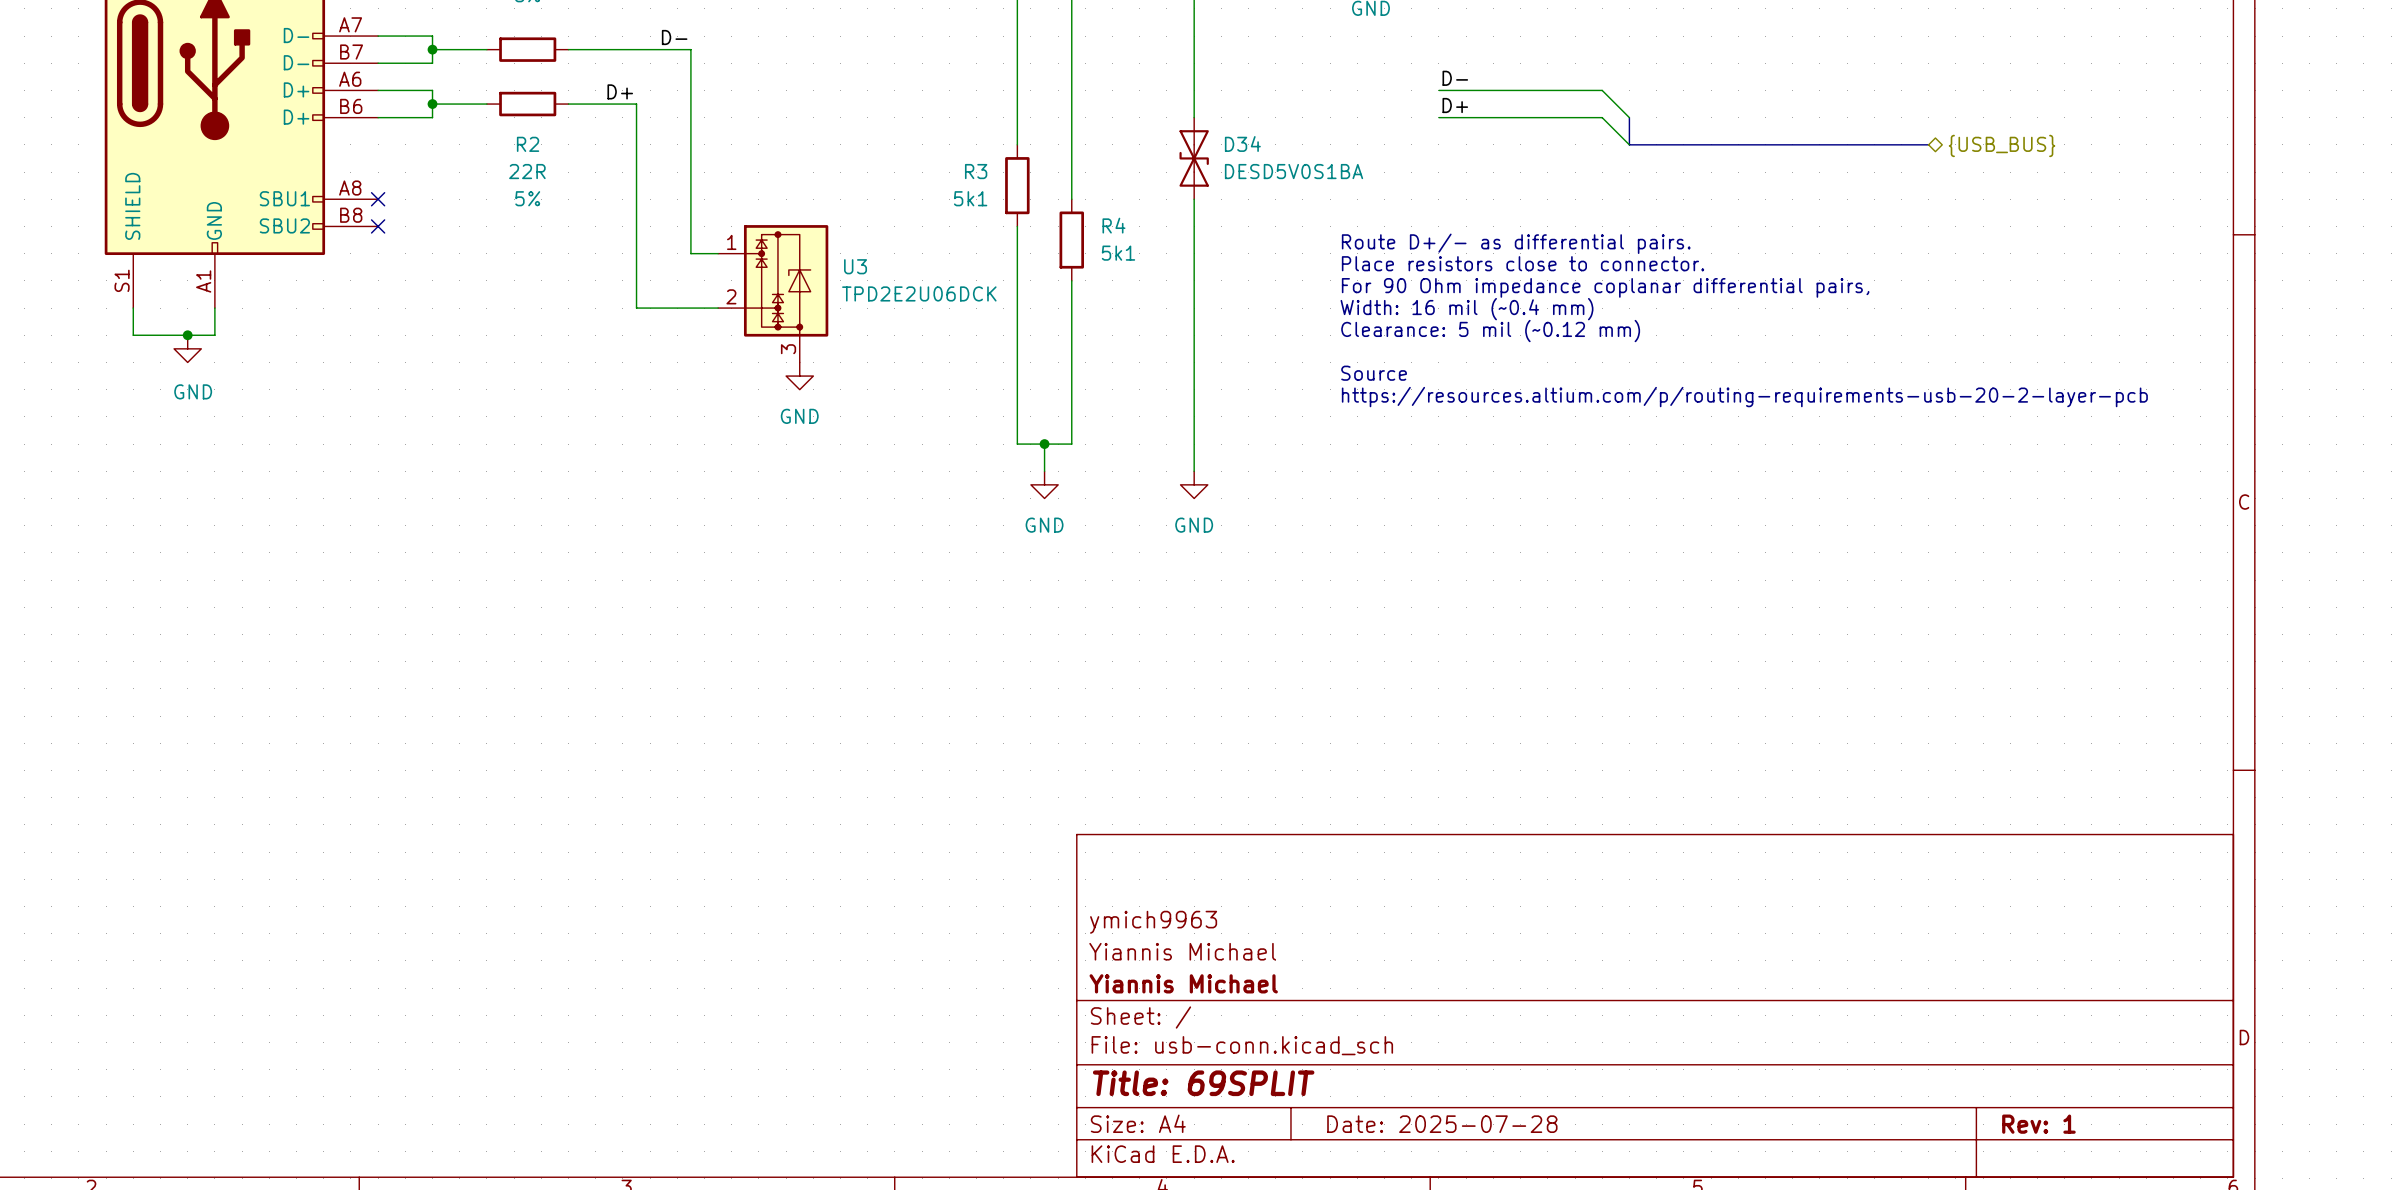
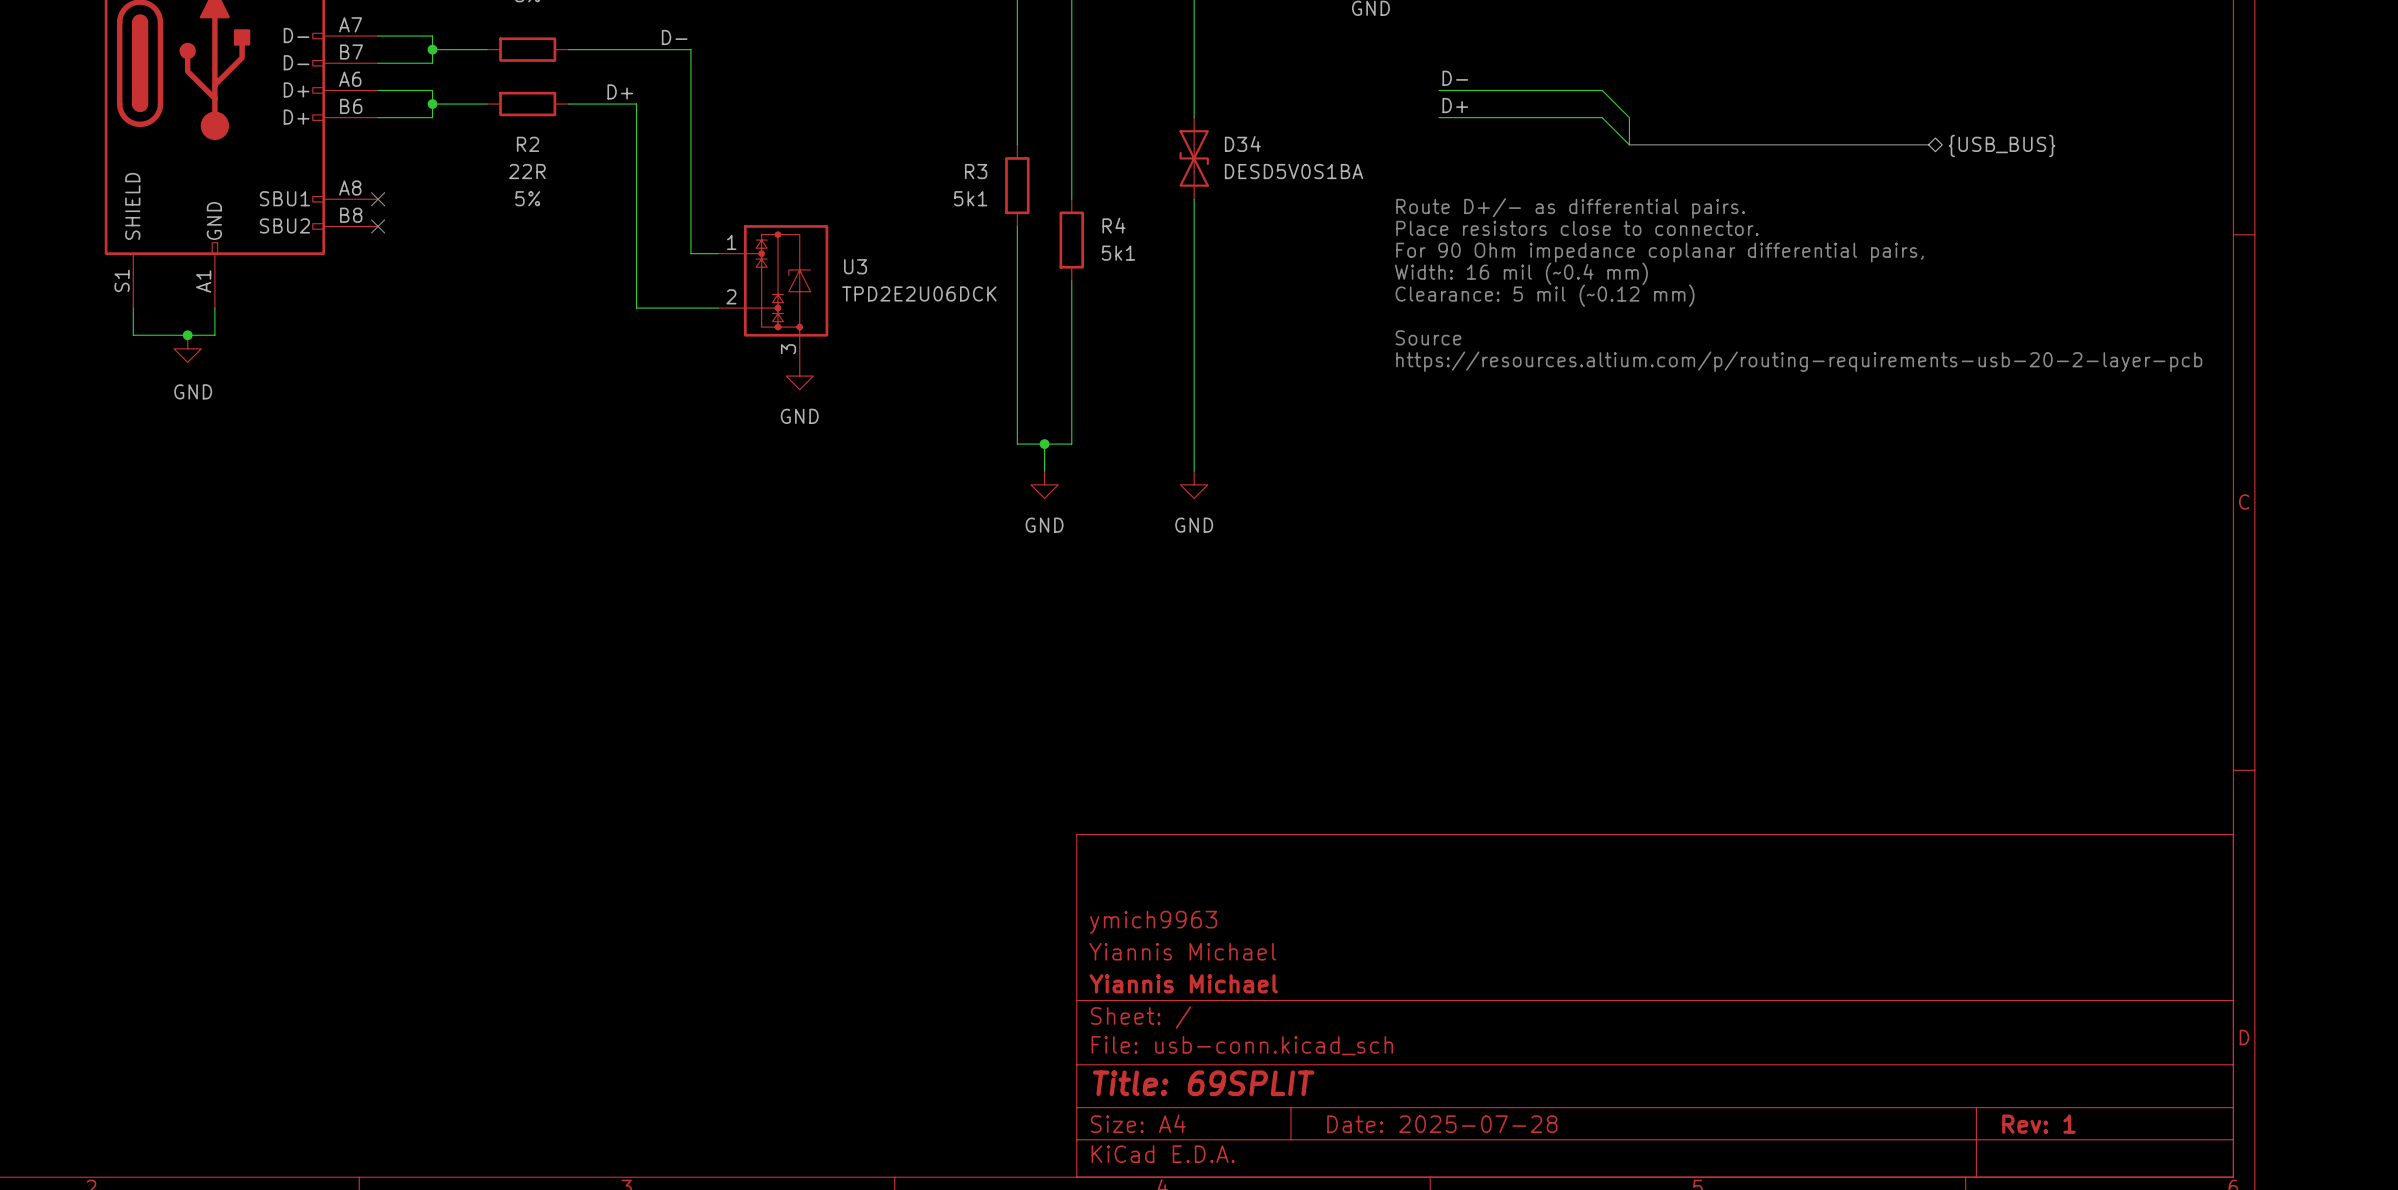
text position: Route D+/- as differential pairs. (1516, 243) -> Route D+/- as differential pairs. (1570, 208)
text position: Place resistors close to connector. (1523, 263) -> Place resistors close to connector. (1577, 228)
text position: For 90 Ohm impedance coplanar differential pairs, (1605, 287) -> For 90 Ohm impedance coplanar differential pairs, (1660, 252)
text position: Width: 16 mil (~0.4 mm) (1467, 309) -> Width: 16 mil (~0.4 mm) (1521, 273)
text position: Clearance: 5 mil (~0.12 mm) (1490, 331) -> Clearance: 5 mil (~0.12 mm) (1545, 295)
text position: Source (1374, 373) -> Source (1428, 337)
text position: https://resources.altium.com/p/routing-requirements-usb-20-2-layer-pcb (1744, 397) -> https://resources.altium.com/p/routing-requirements-usb-20-2-layer-pcb (1799, 361)

